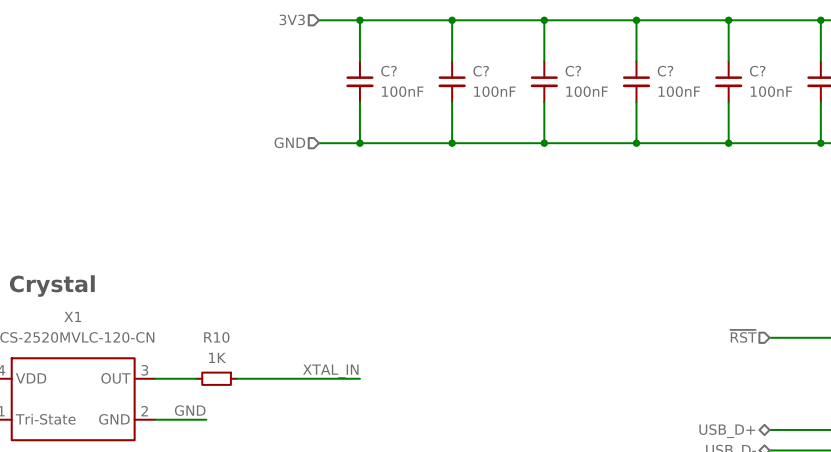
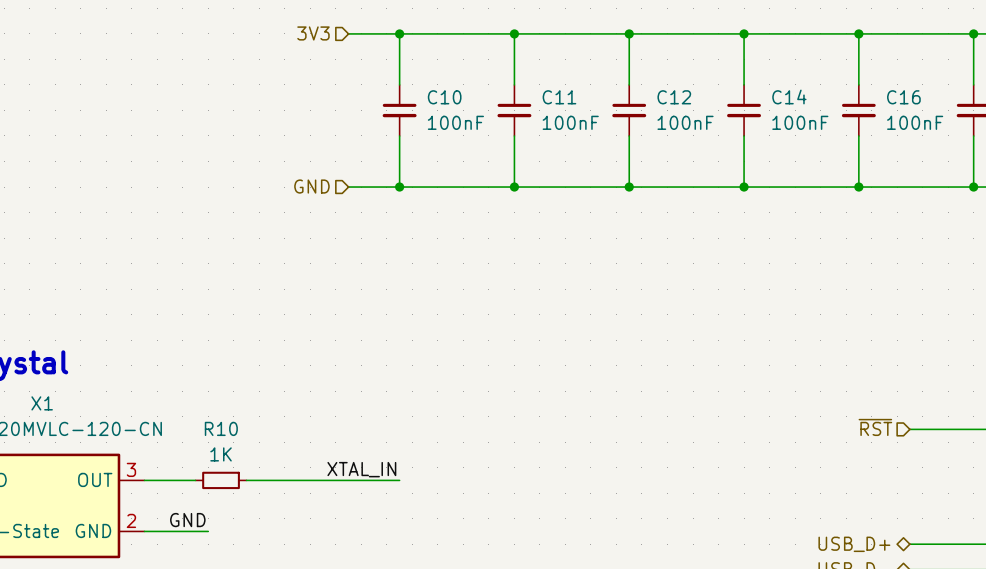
C? name: C? (388, 71) -> C10 (444, 97)
C? name: C? (481, 71) -> C11 (559, 97)
C? name: C? (573, 71) -> C12 (674, 97)
C? name: C? (665, 71) -> C14 (789, 97)
C? name: C? (757, 71) -> C16 (903, 97)

